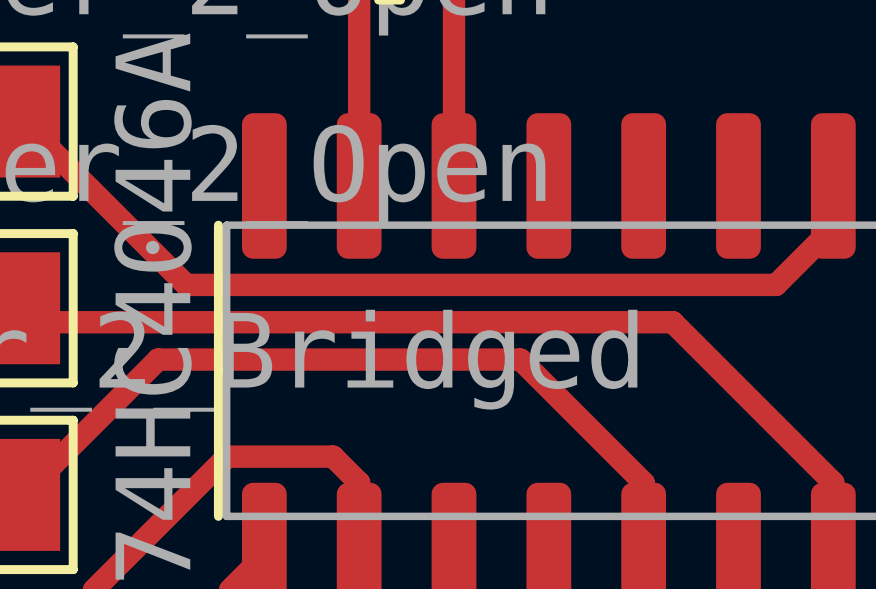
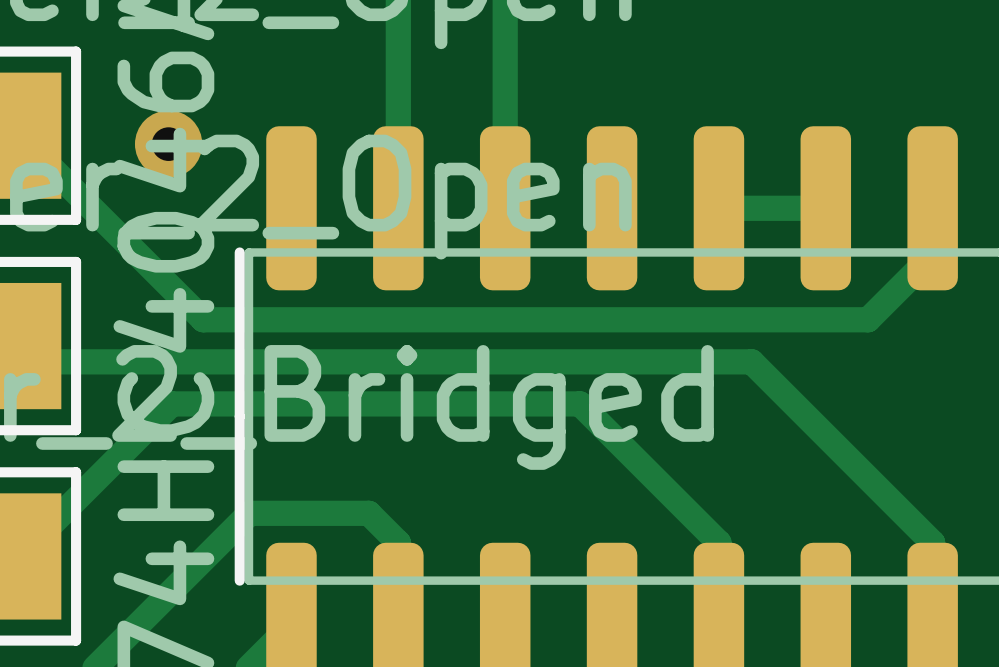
via: none -> (168, 144)
track: none -> (718, 208) (825, 208)

